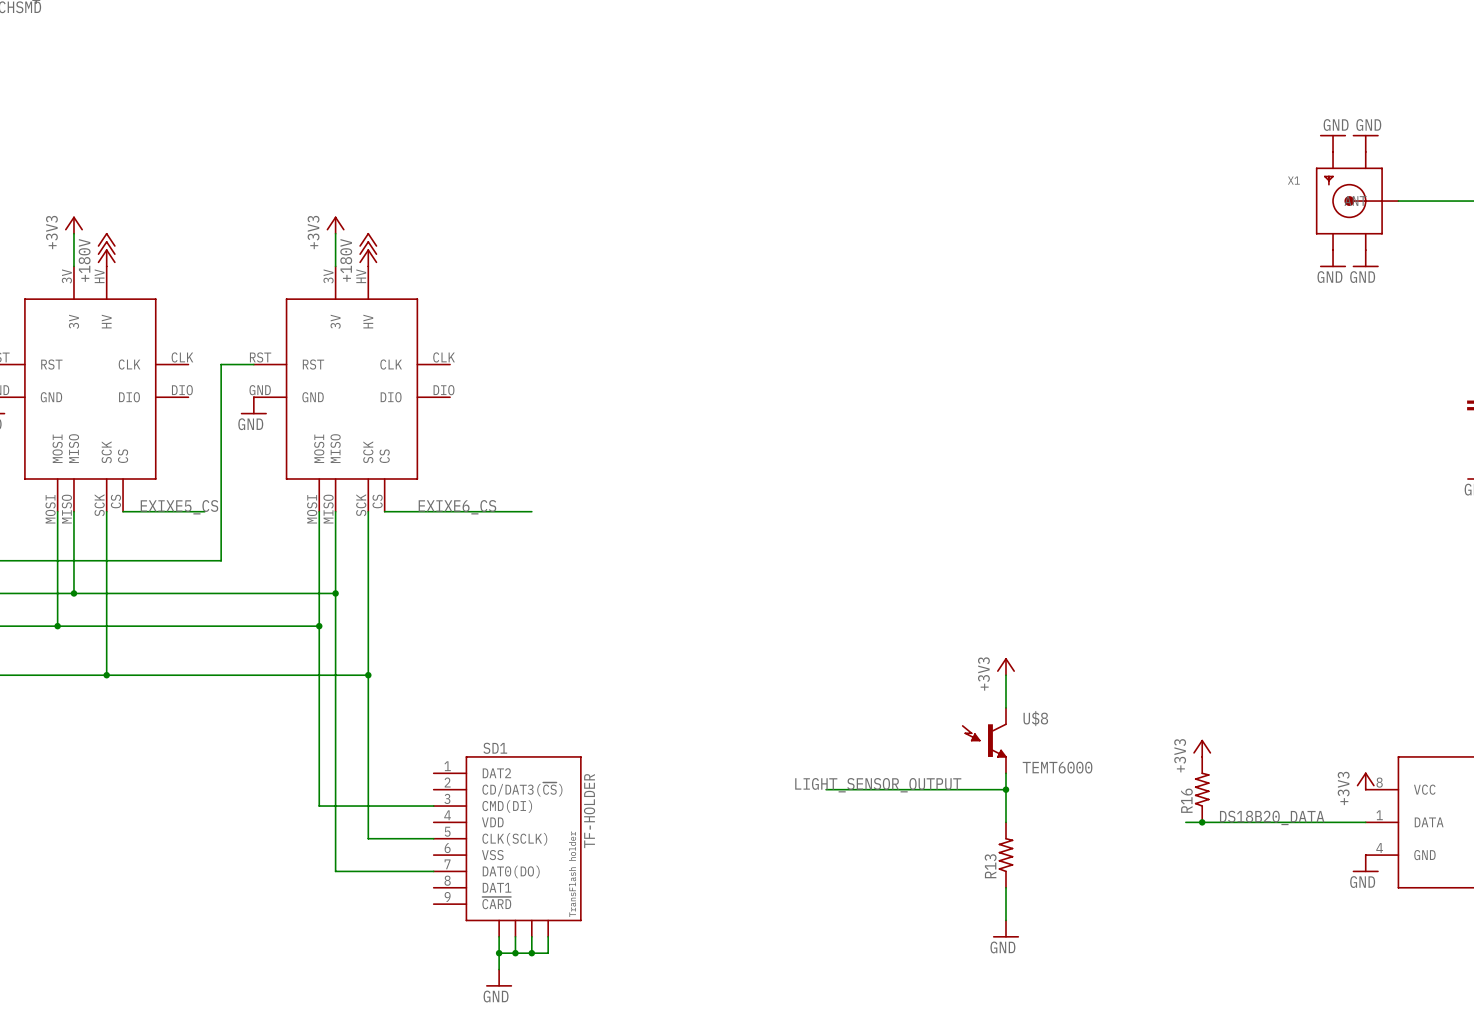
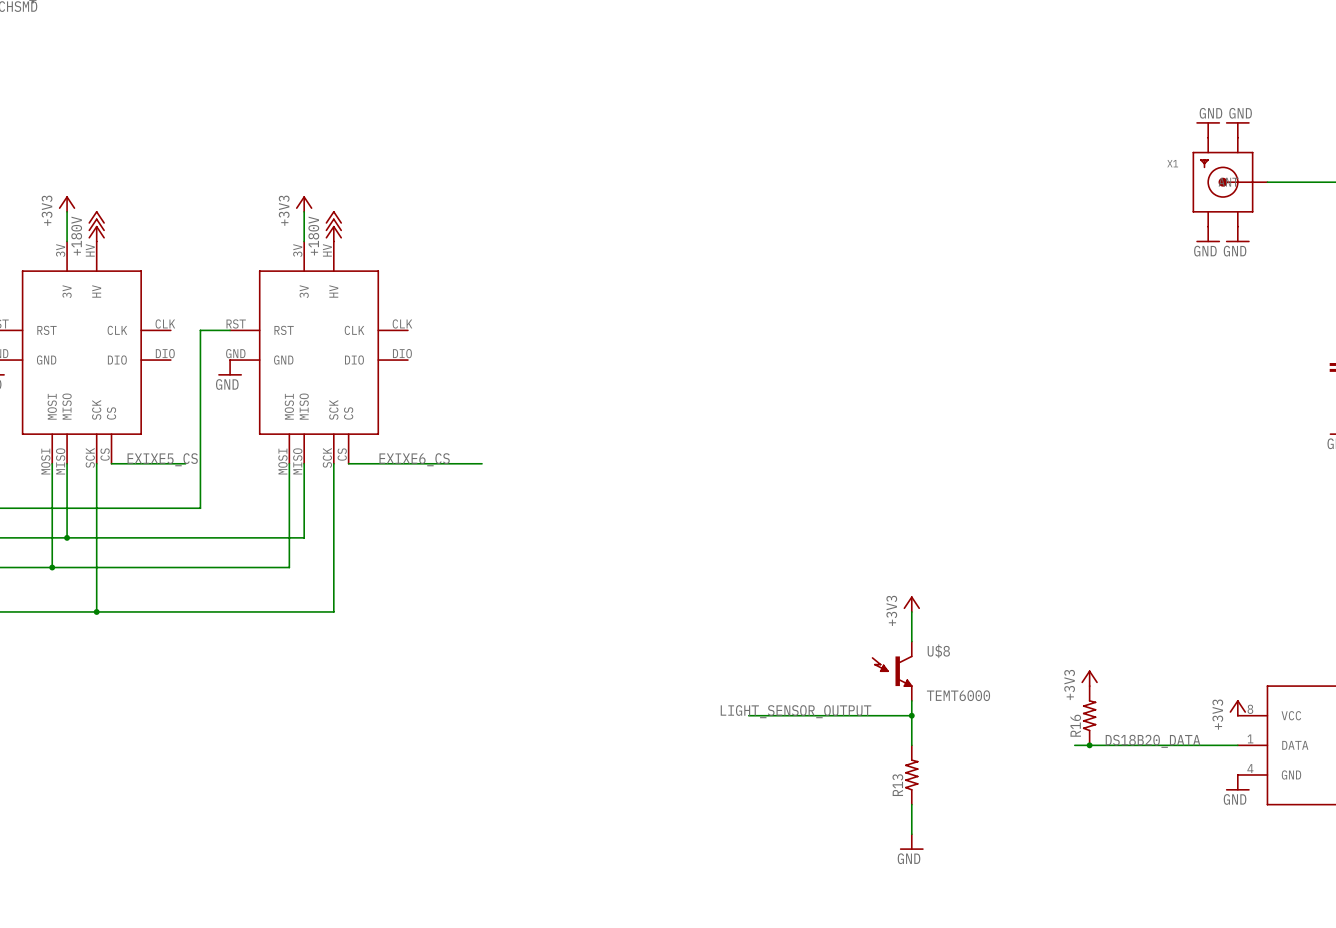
wire: (335, 593) (335, 871) (433, 871) -> none
junction: (335, 593) -> none
wire: (319, 626) (319, 806) (433, 806) -> none
junction: (319, 626) -> none
wire: (368, 675) (368, 838) (433, 838) -> none
junction: (368, 675) -> none
SD1: TF-HOLDER (507, 846) -> none
wire: (499, 936) (499, 969) -> none
wire: (515, 936) (515, 953) -> none
wire: (531, 936) (531, 953) -> none
wire: (548, 936) (548, 953) (499, 953) -> none
junction: (499, 953) -> none
junction: (515, 953) -> none
junction: (531, 953) -> none
power symbol: GND (499, 978) -> none

